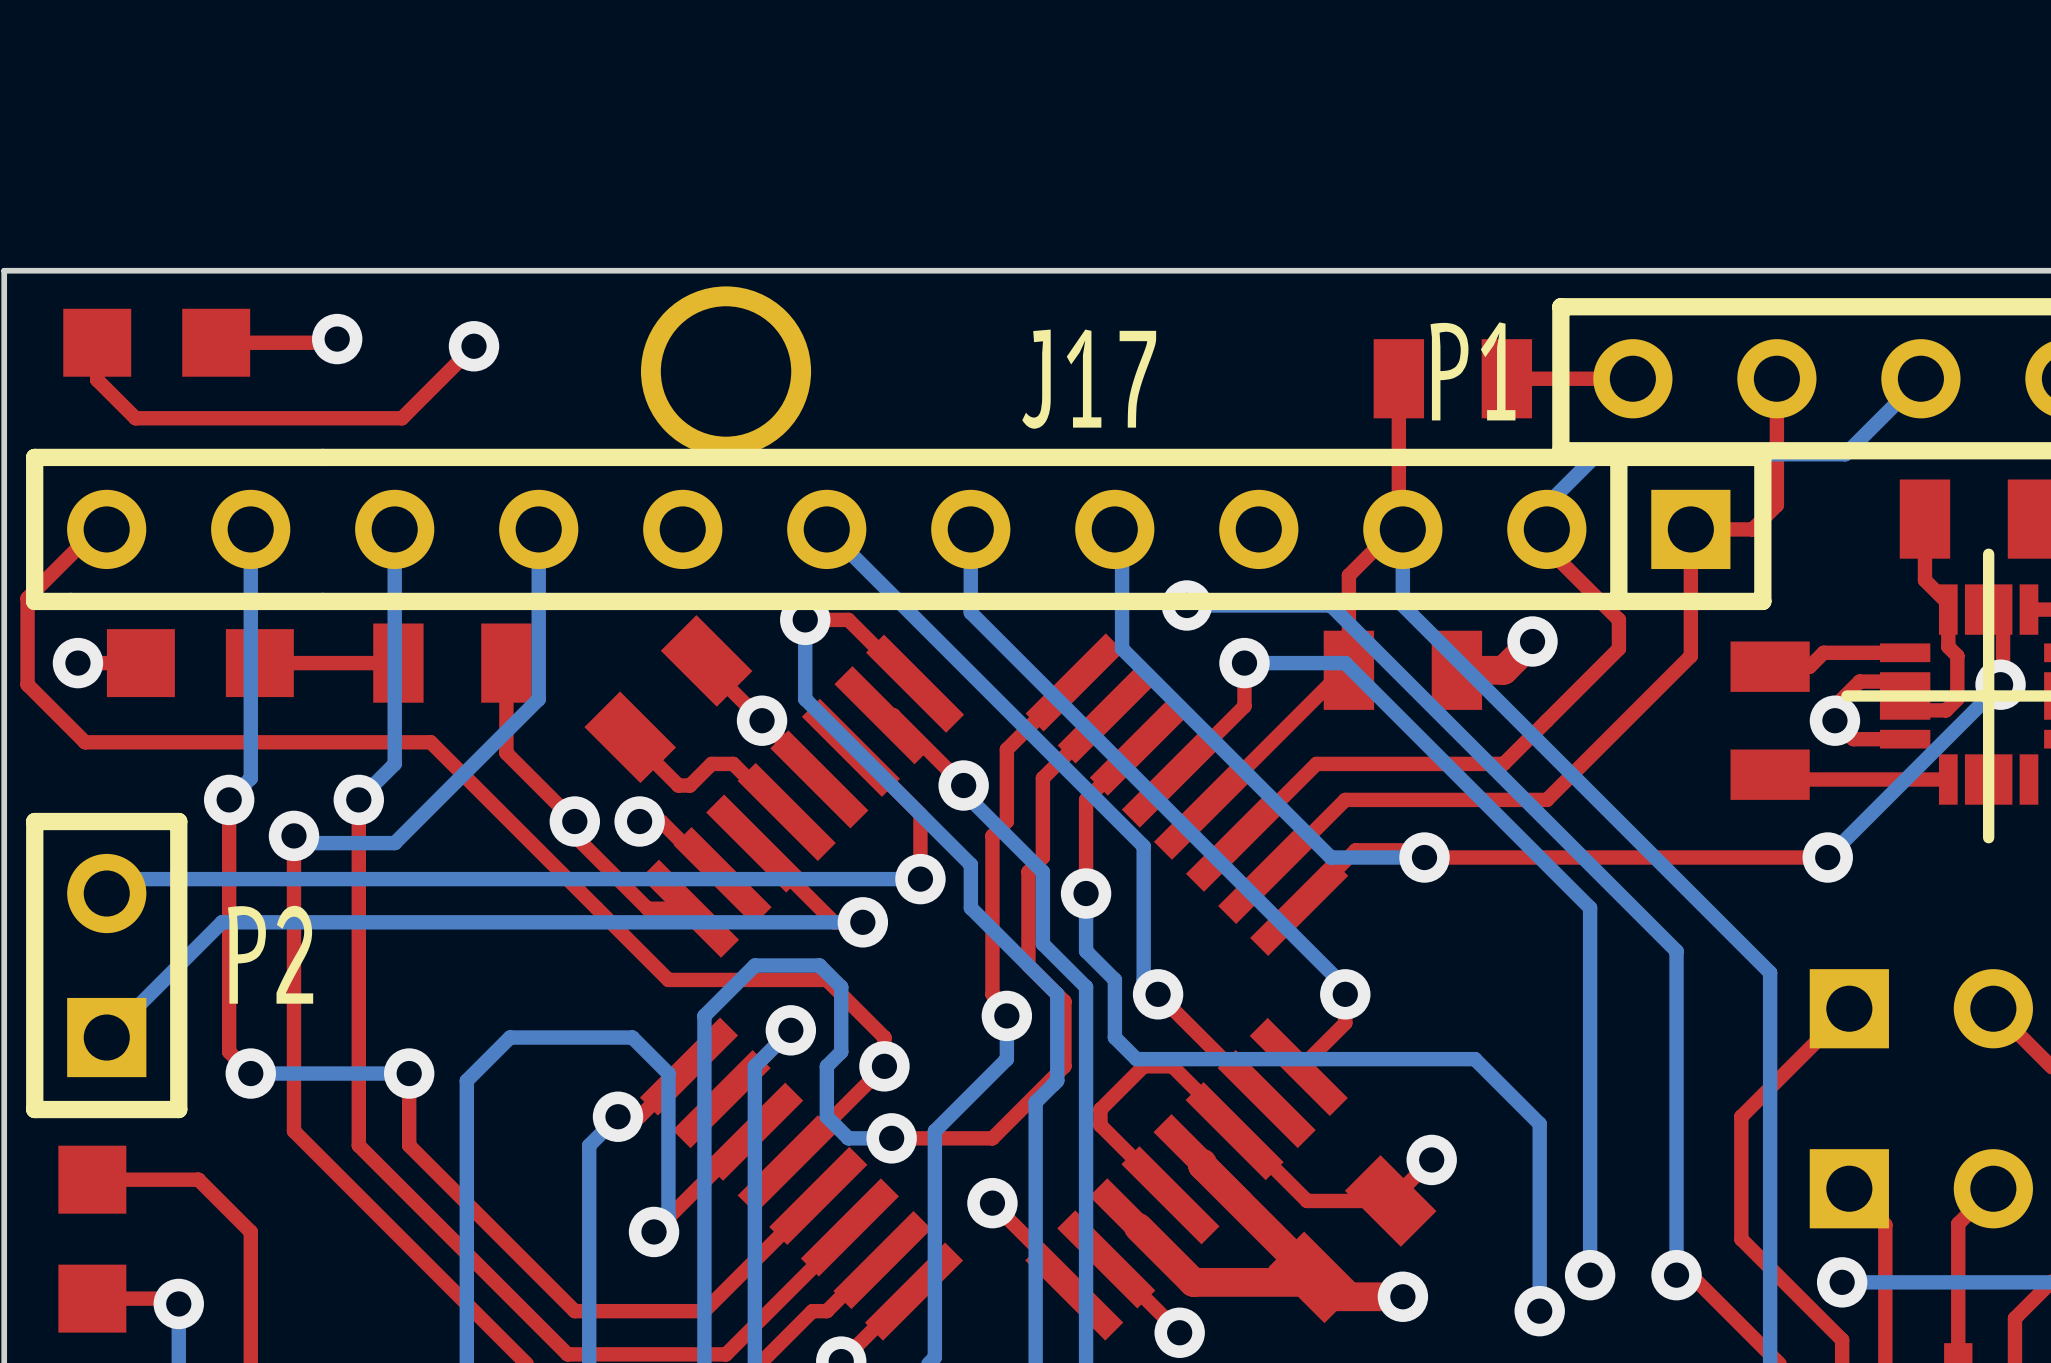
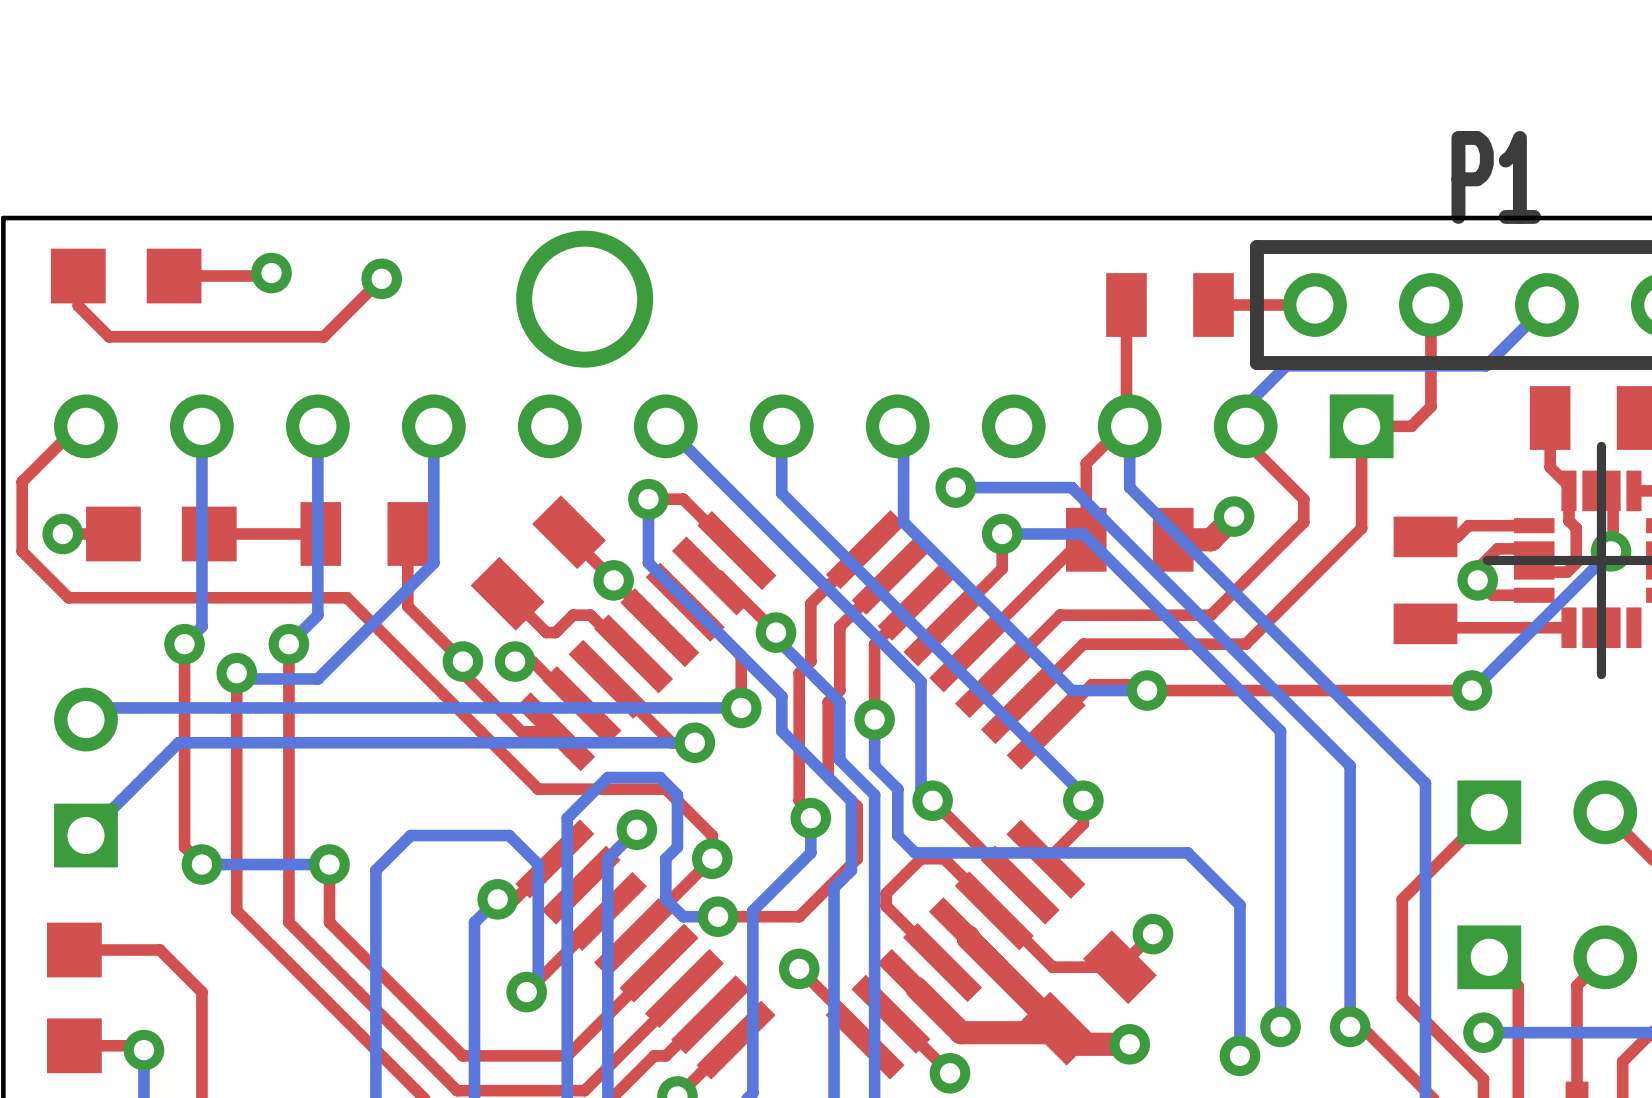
P1 name position: P1 (1472, 371) -> P1 (1496, 177)
J17 side: bottom (898, 529) -> top (723, 426)
P2 side: bottom (106, 965) -> top (85, 777)

